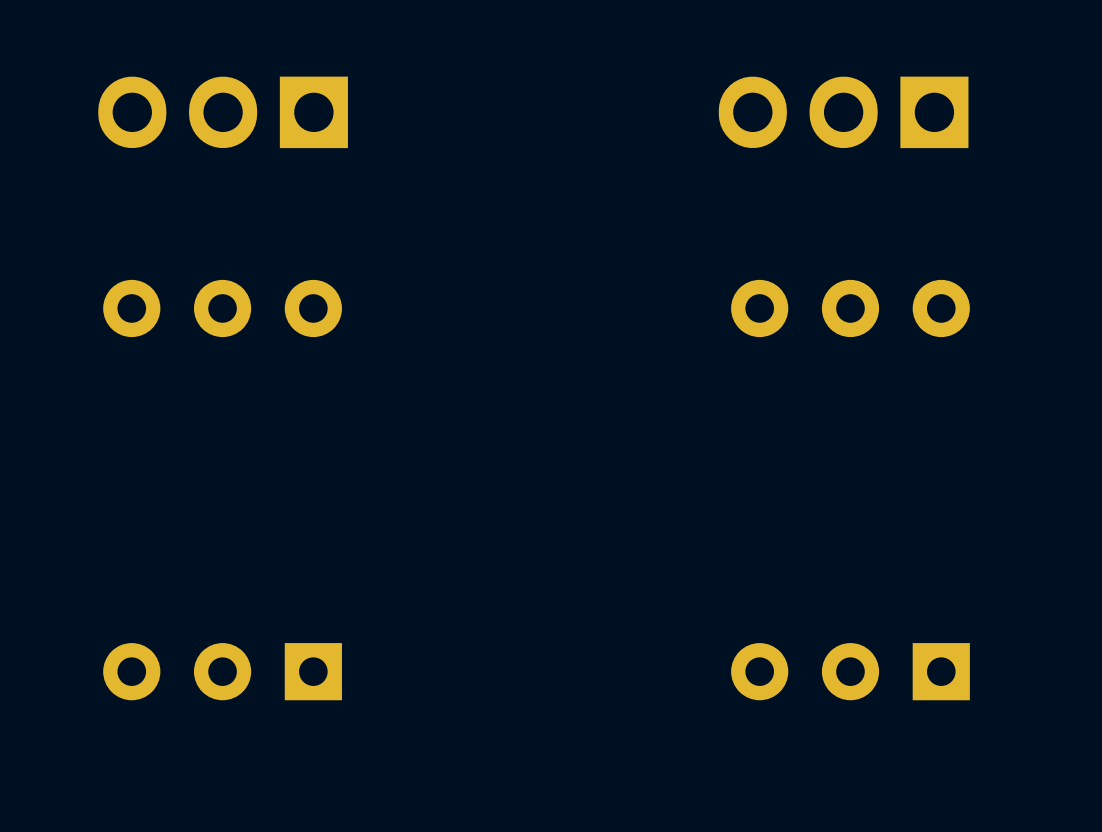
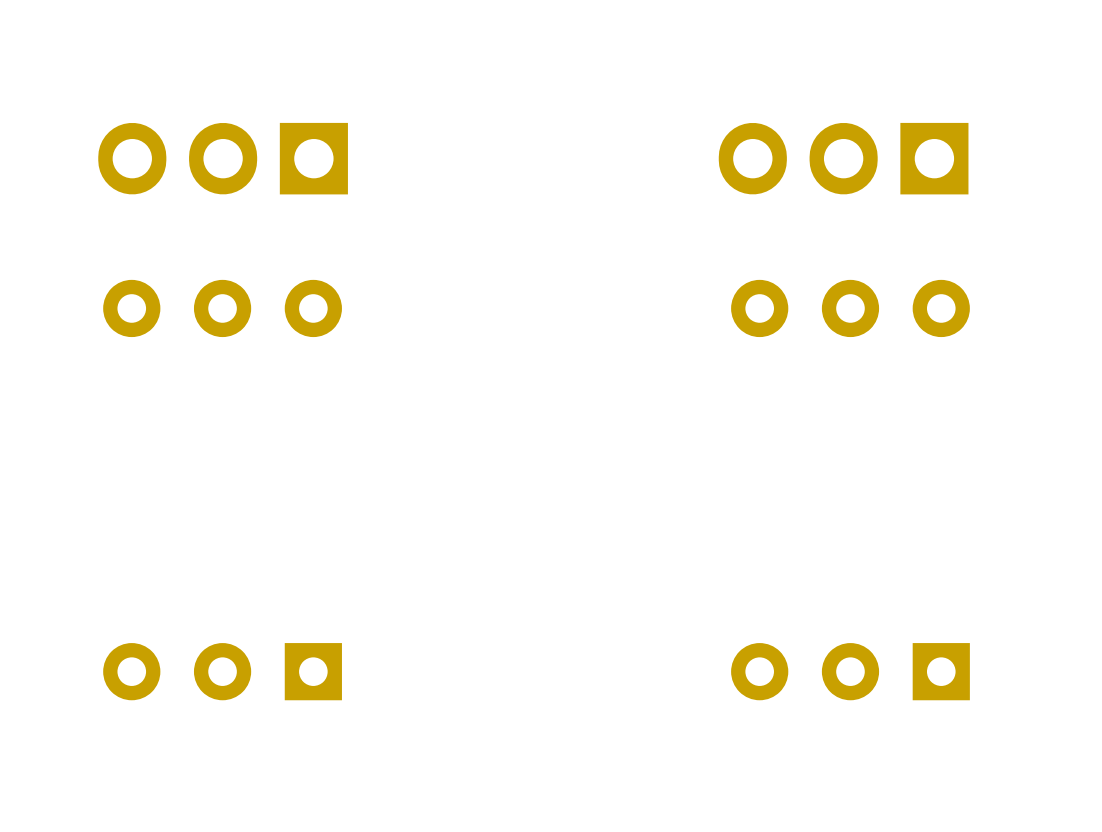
part position: (223, 112) -> (223, 158)
part position: (843, 112) -> (843, 158)

